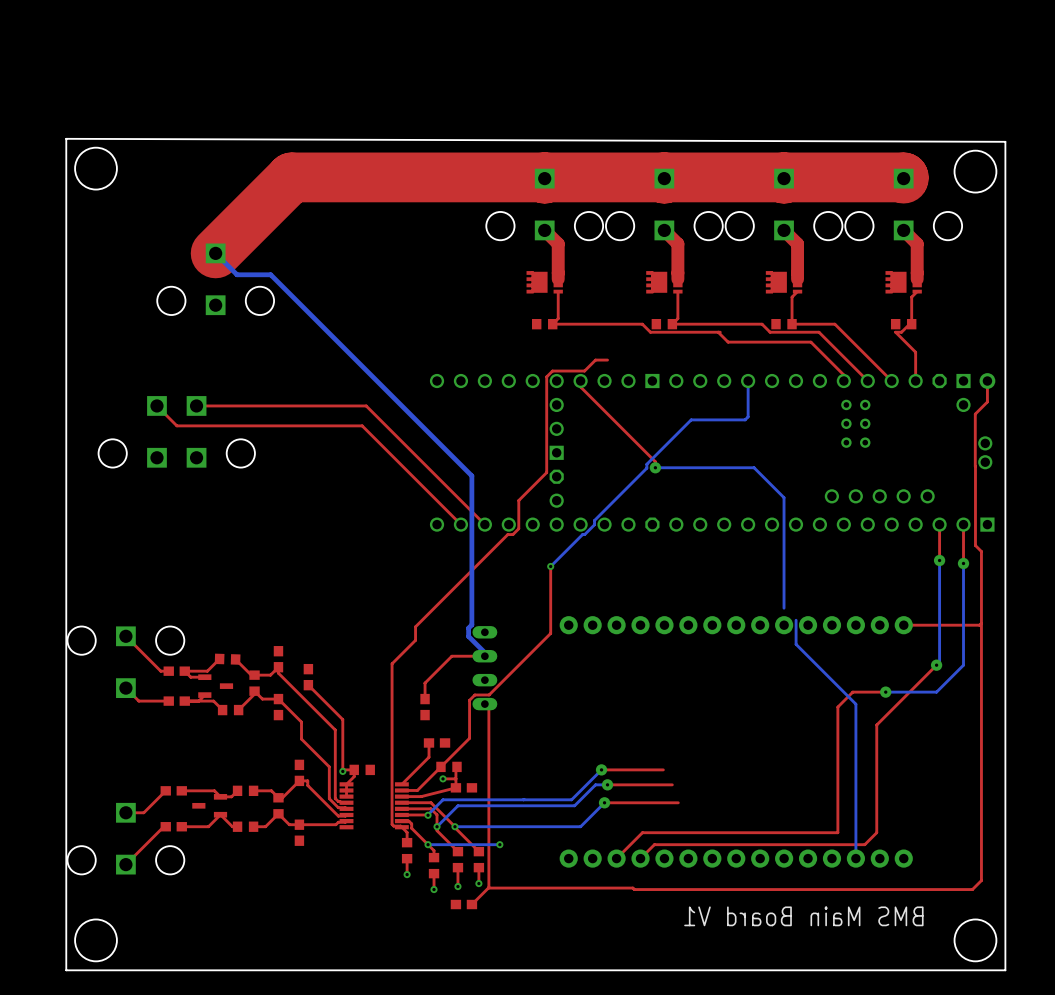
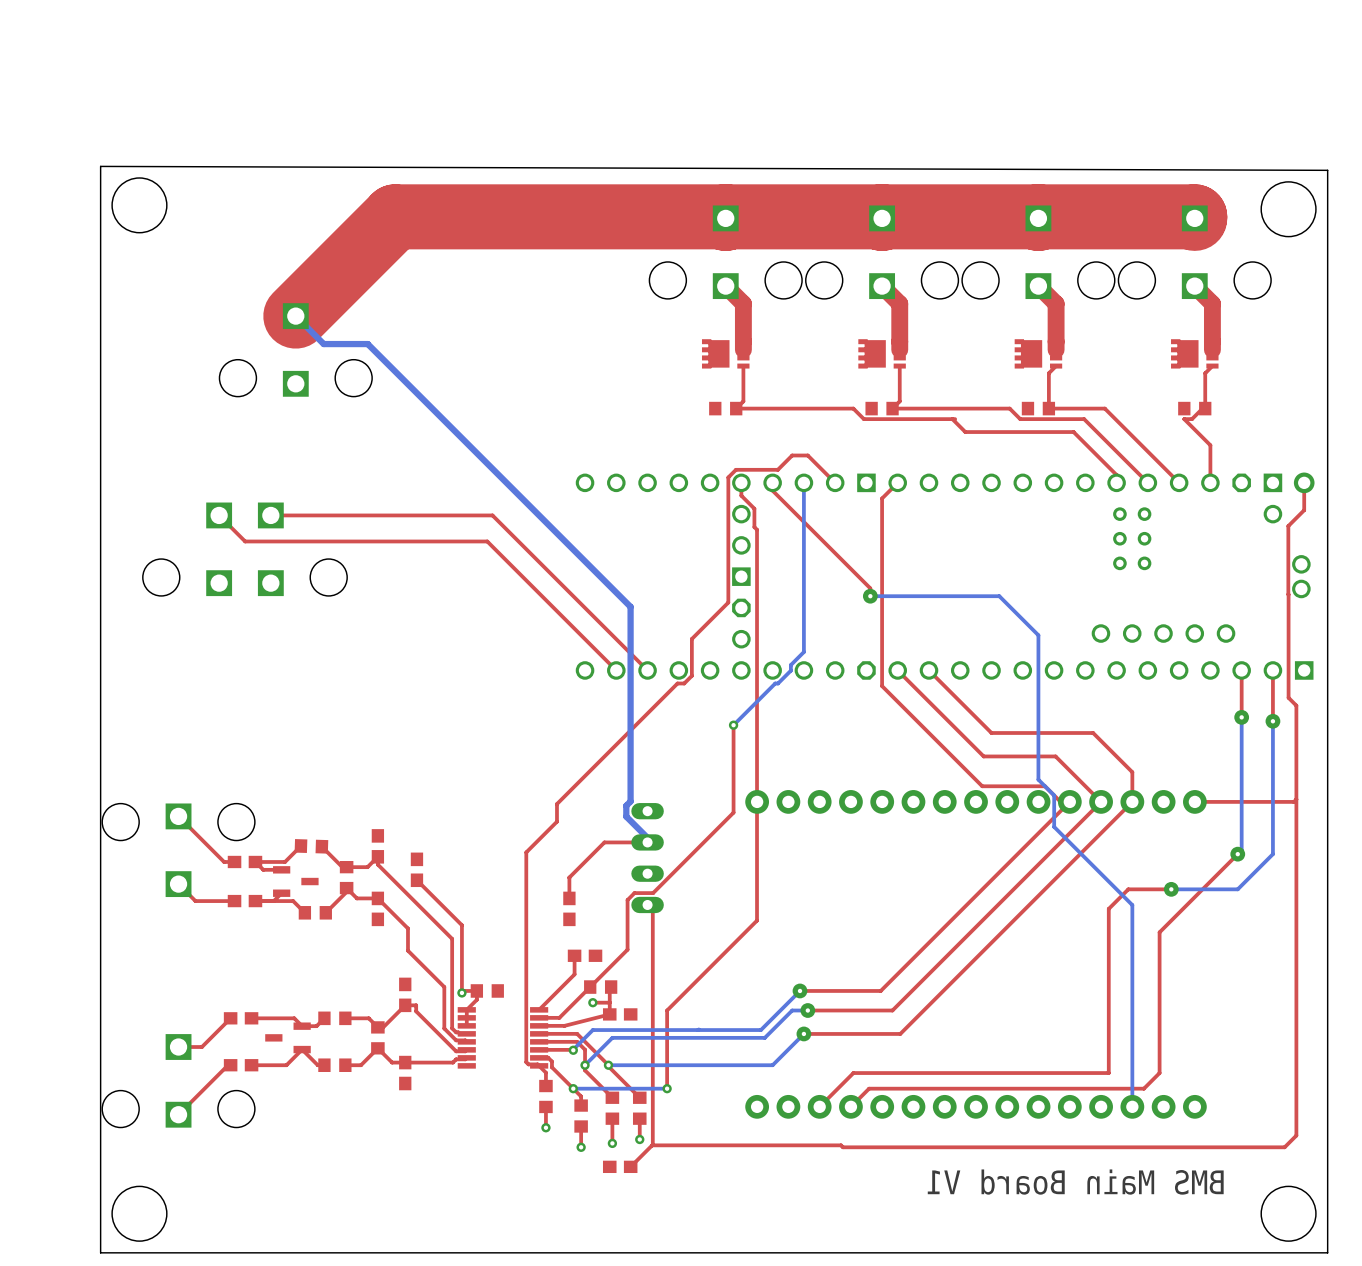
top track: none -> (807, 455) (835, 482)
top track: none -> (741, 482) (741, 495) (754, 508) (754, 527) (757, 529) (757, 920) (667, 1010) (667, 1088)
top track: none -> (897, 482) (882, 498) (882, 686) (982, 786) (1045, 786) (1060, 801) (1069, 801) (880, 990)
bottom track: (748, 381) (748, 416) (745, 419) (691, 419) (604, 510) -> (803, 482) (803, 652)
top track: none -> (897, 670) (983, 756) (1055, 756) (1101, 801) (892, 1010)
top track: none -> (928, 670) (991, 733) (1093, 733) (1132, 772) (1132, 801) (900, 1033)
bottom track: none -> (1038, 779) (1054, 795)

